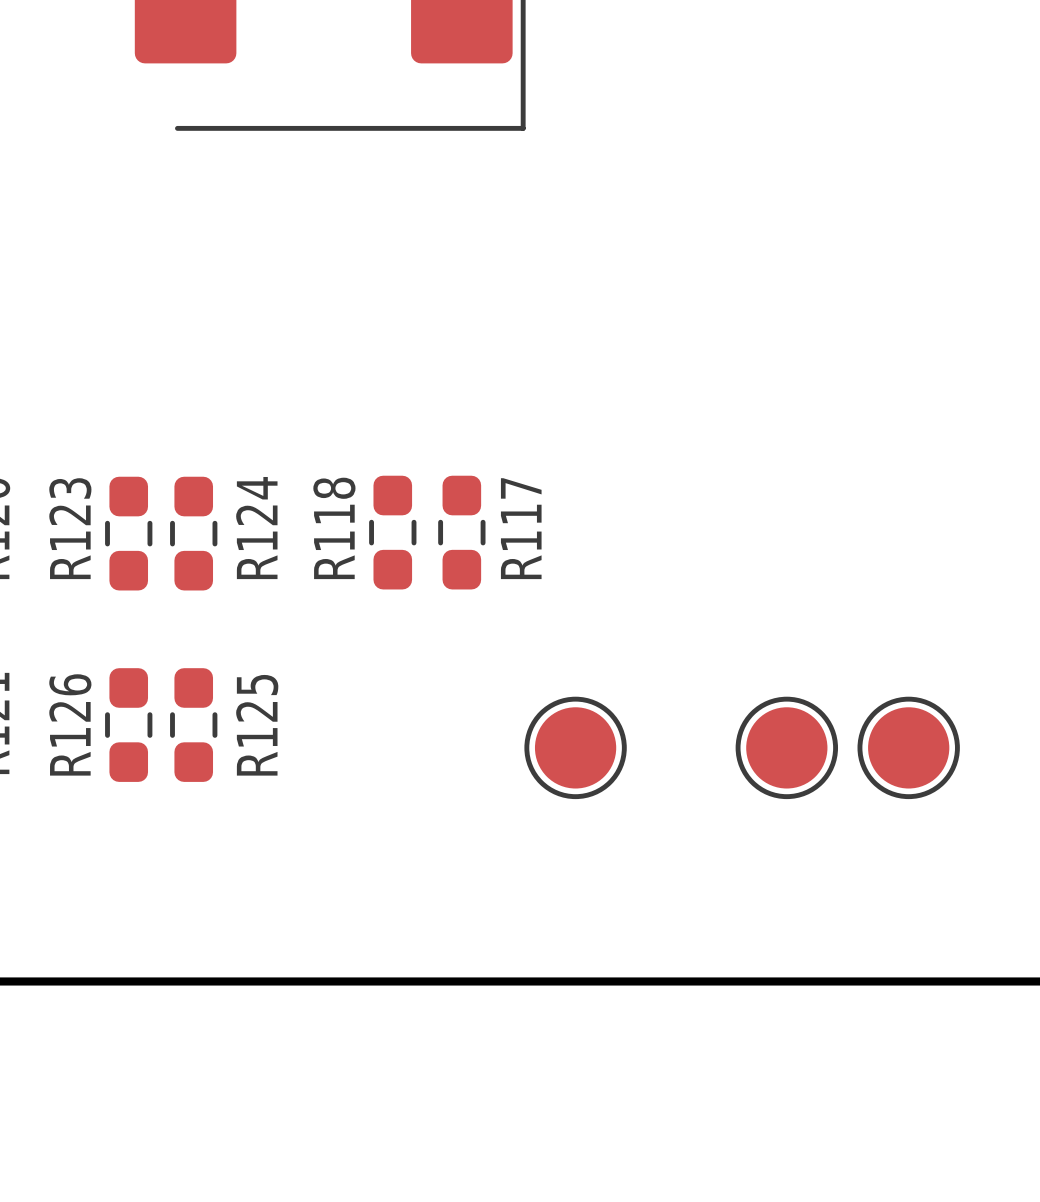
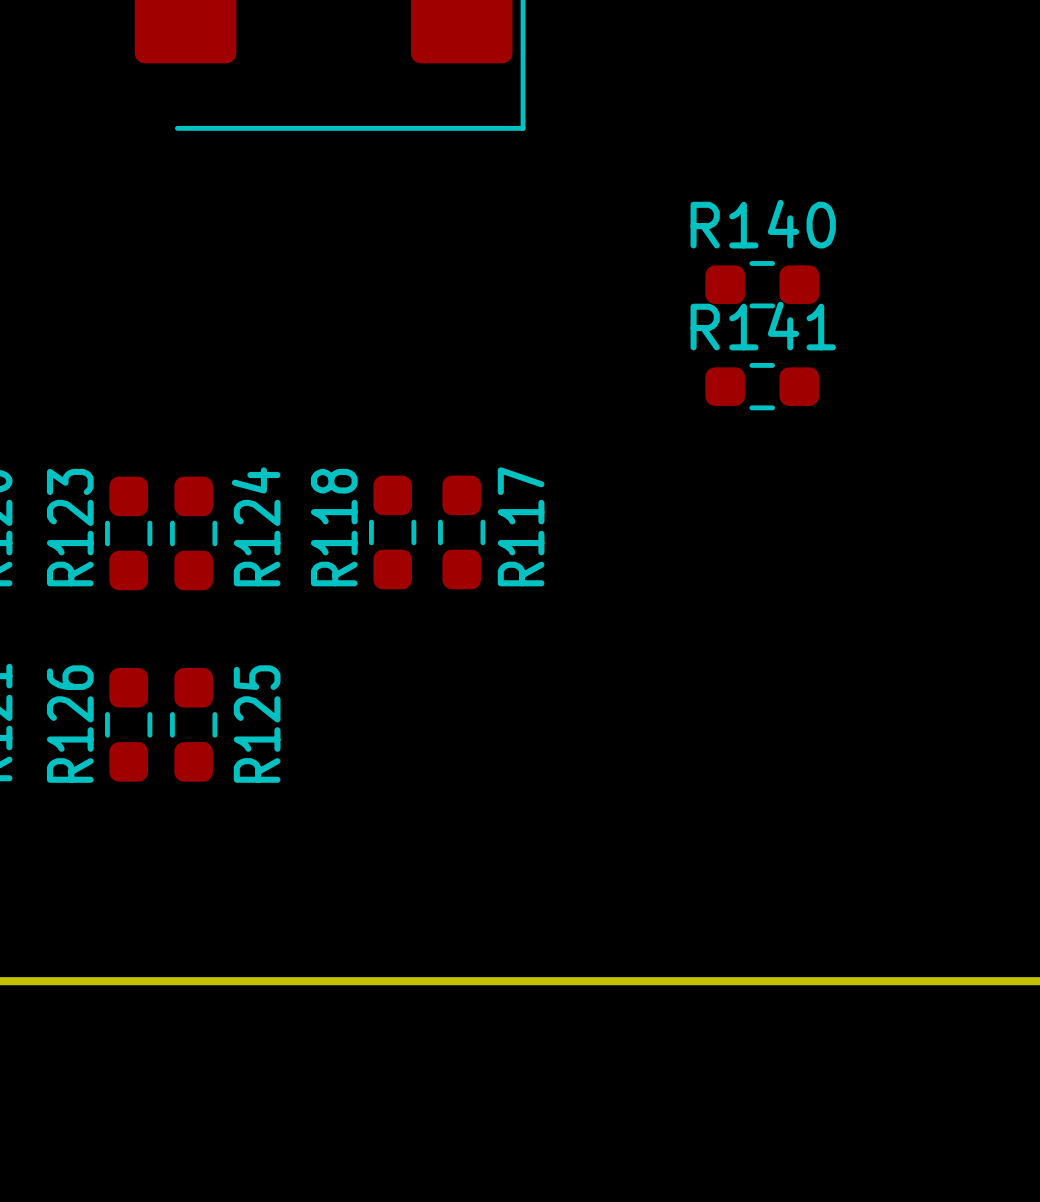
R140: none -> (762, 284)
R141: none -> (762, 386)
part: (575, 747) -> none
part: (786, 747) -> none
part: (908, 747) -> none

